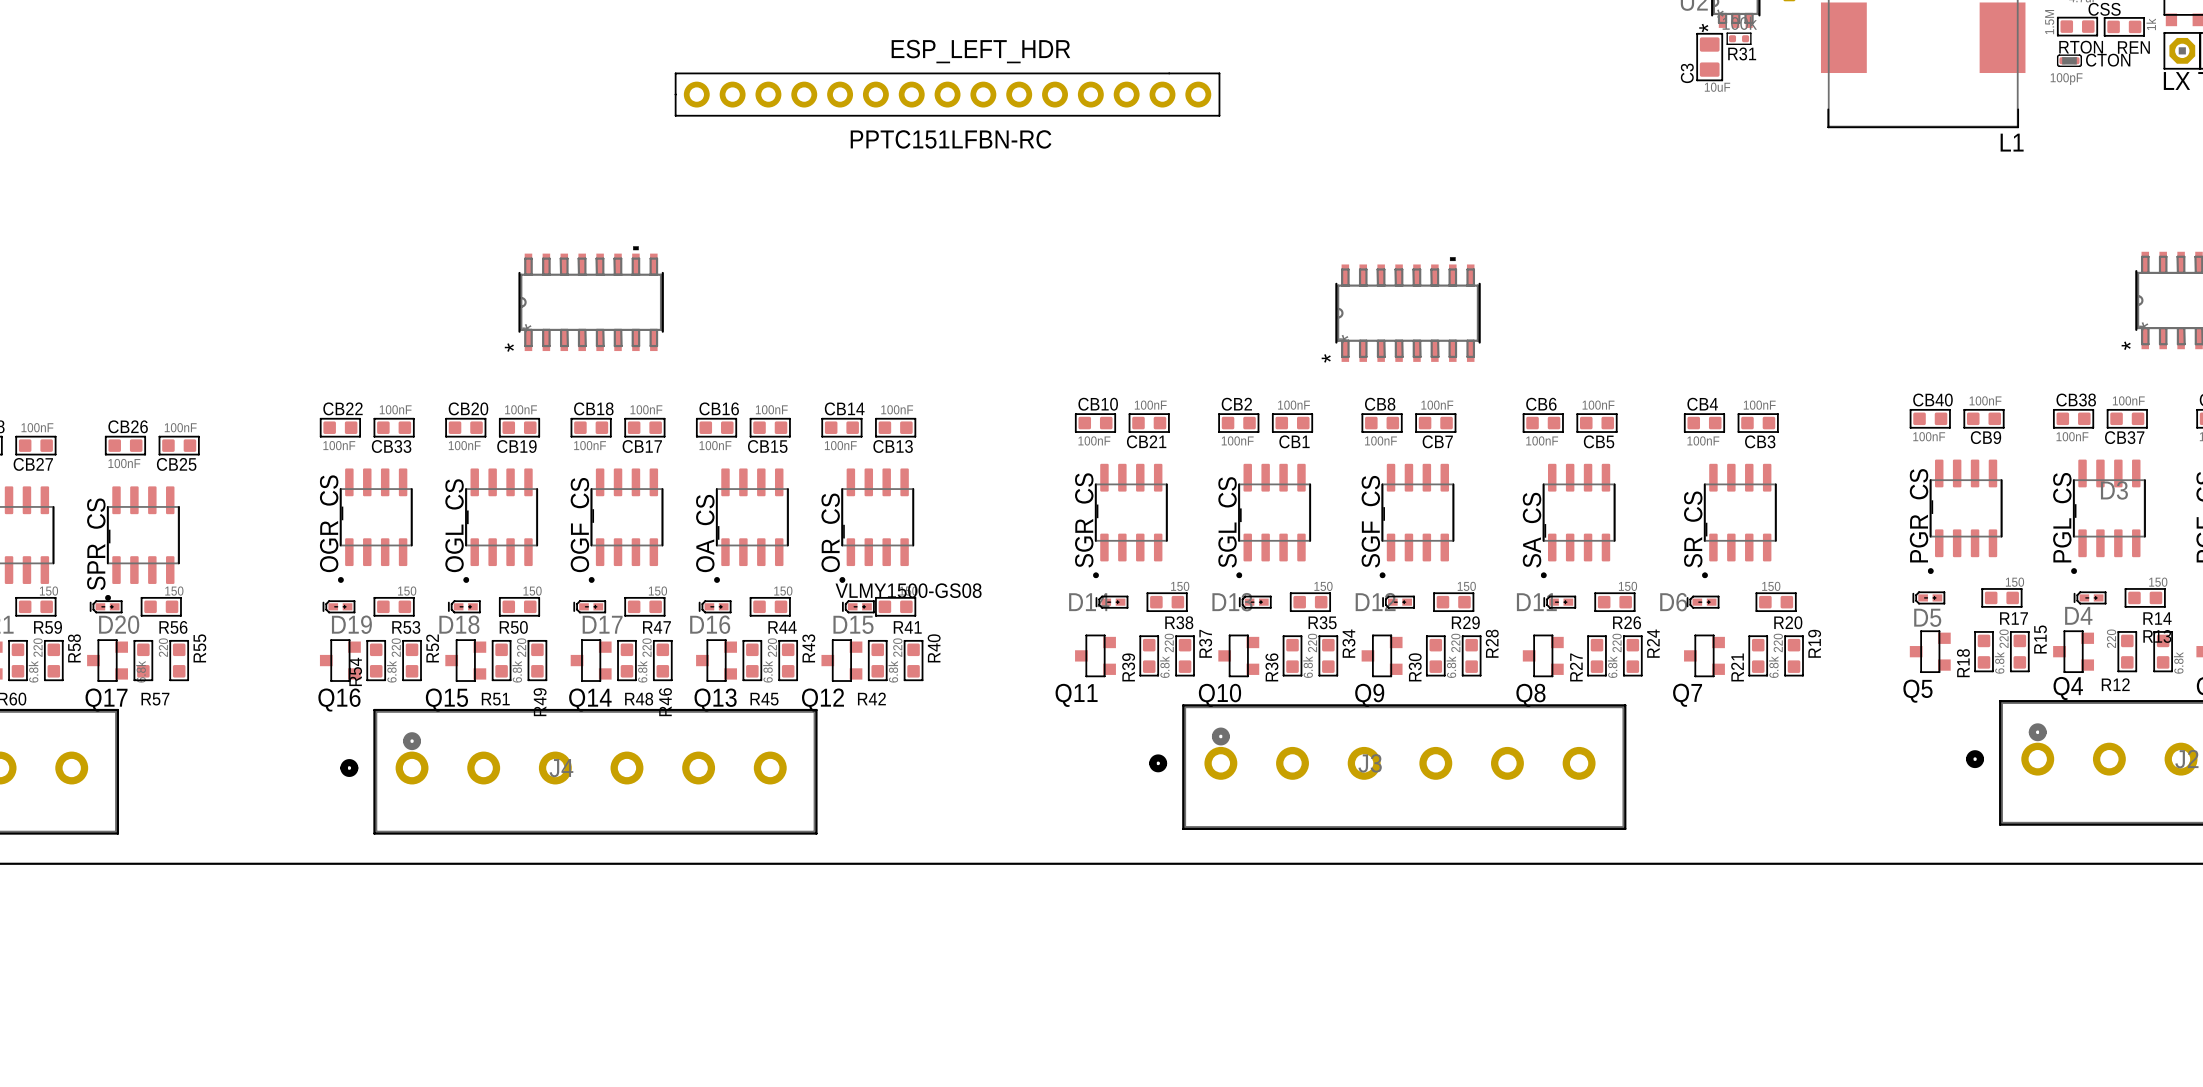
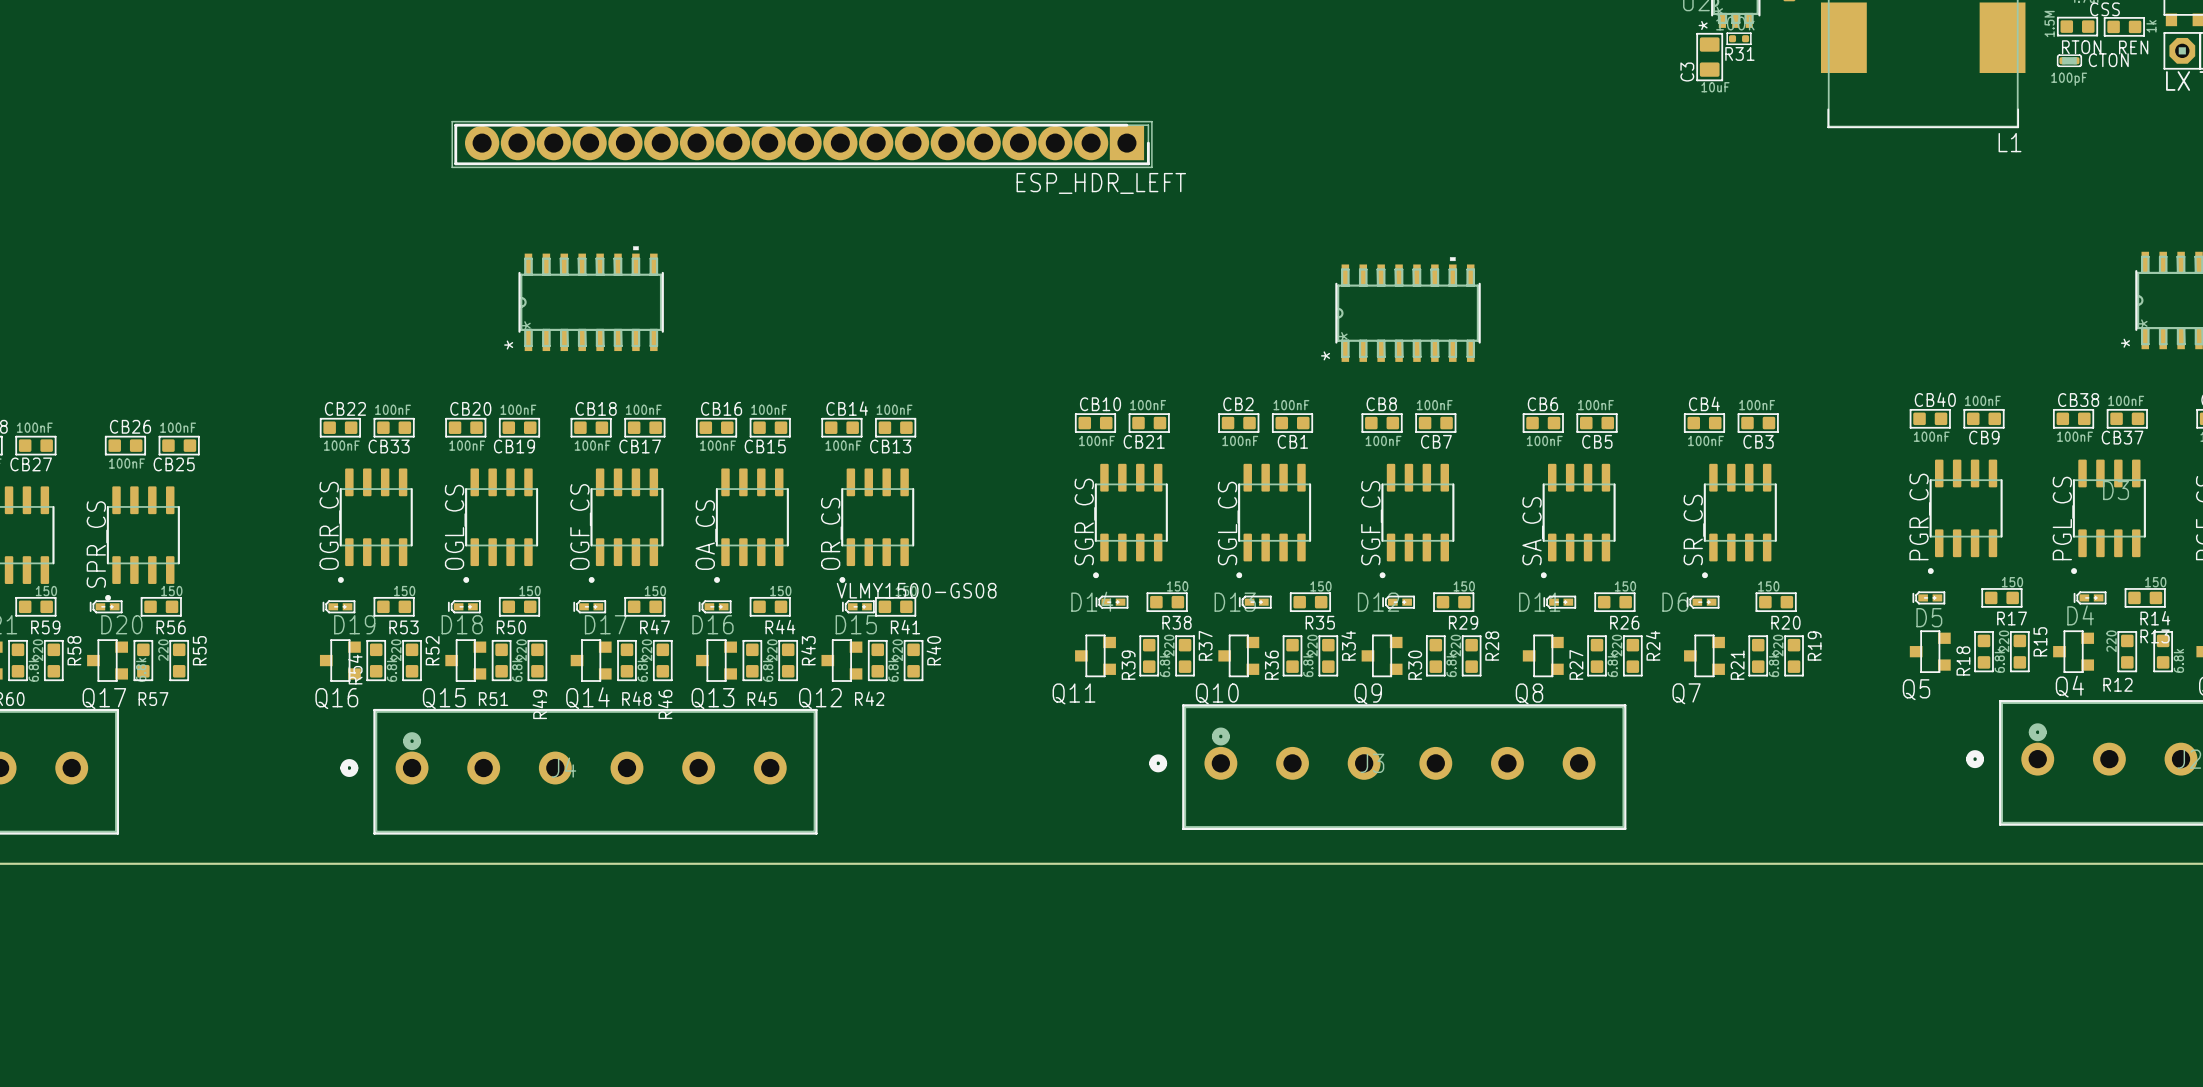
ESP_LEFT_HDR: (947, 94) -> none
ESP_HDR_LEFT: none -> (802, 144)

